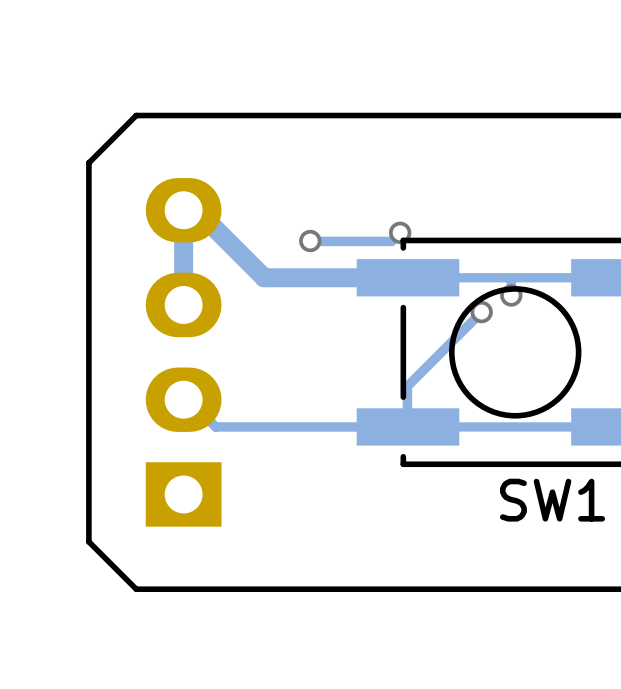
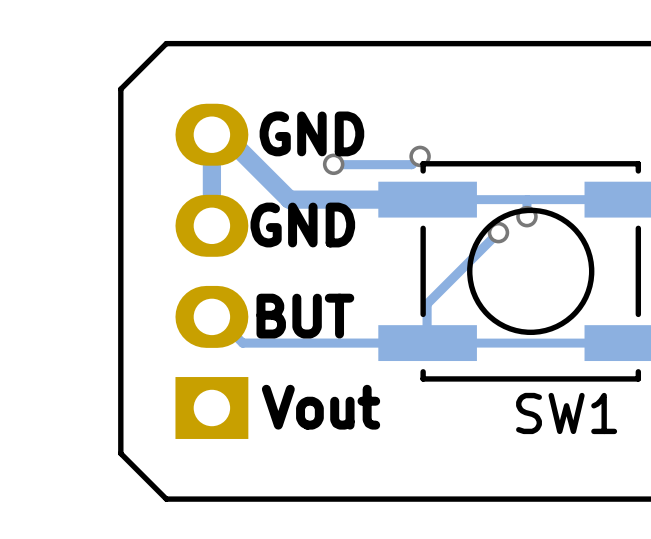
text: none -> GND (311, 133)
text: none -> GND (302, 225)
text: none -> BUT (305, 316)
text: none -> Vout (321, 407)

